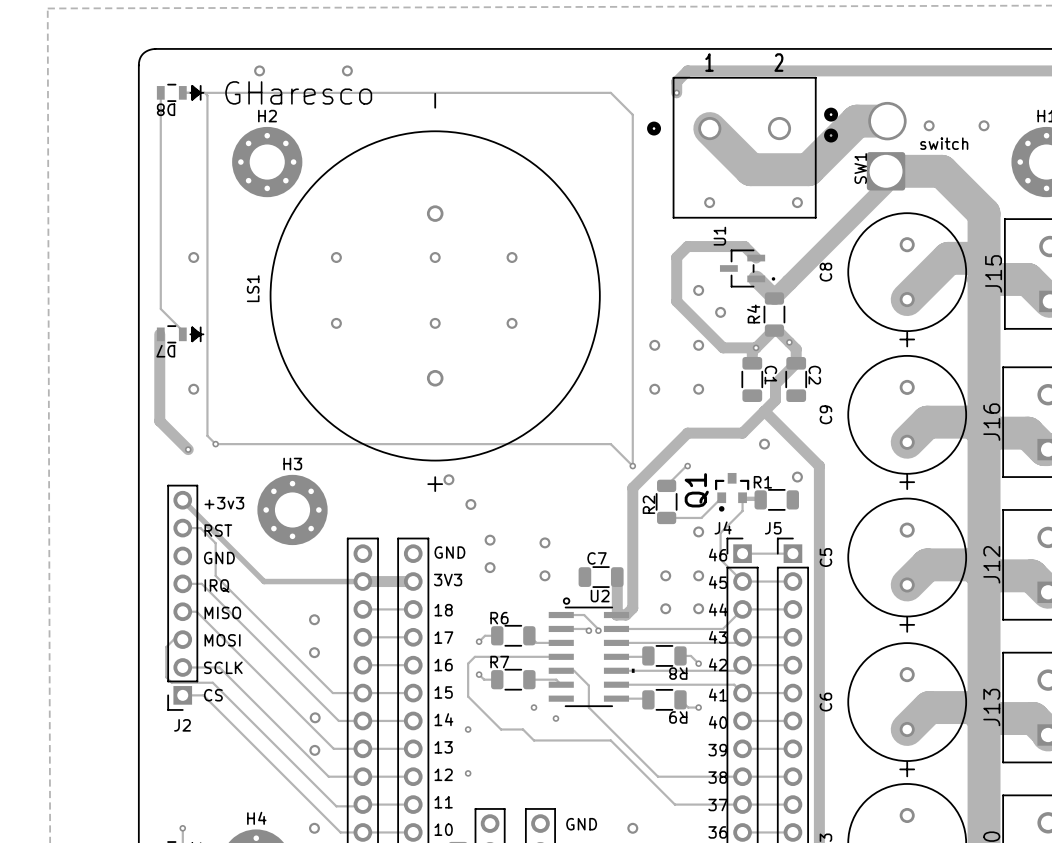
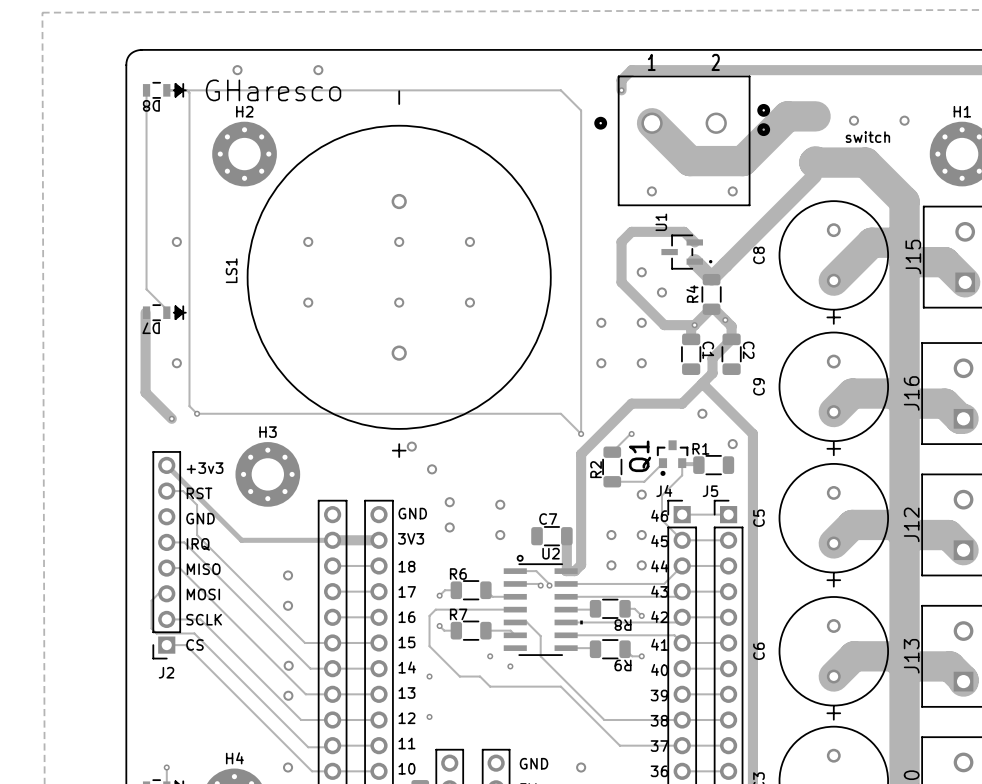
SW1: (886, 146) -> none

